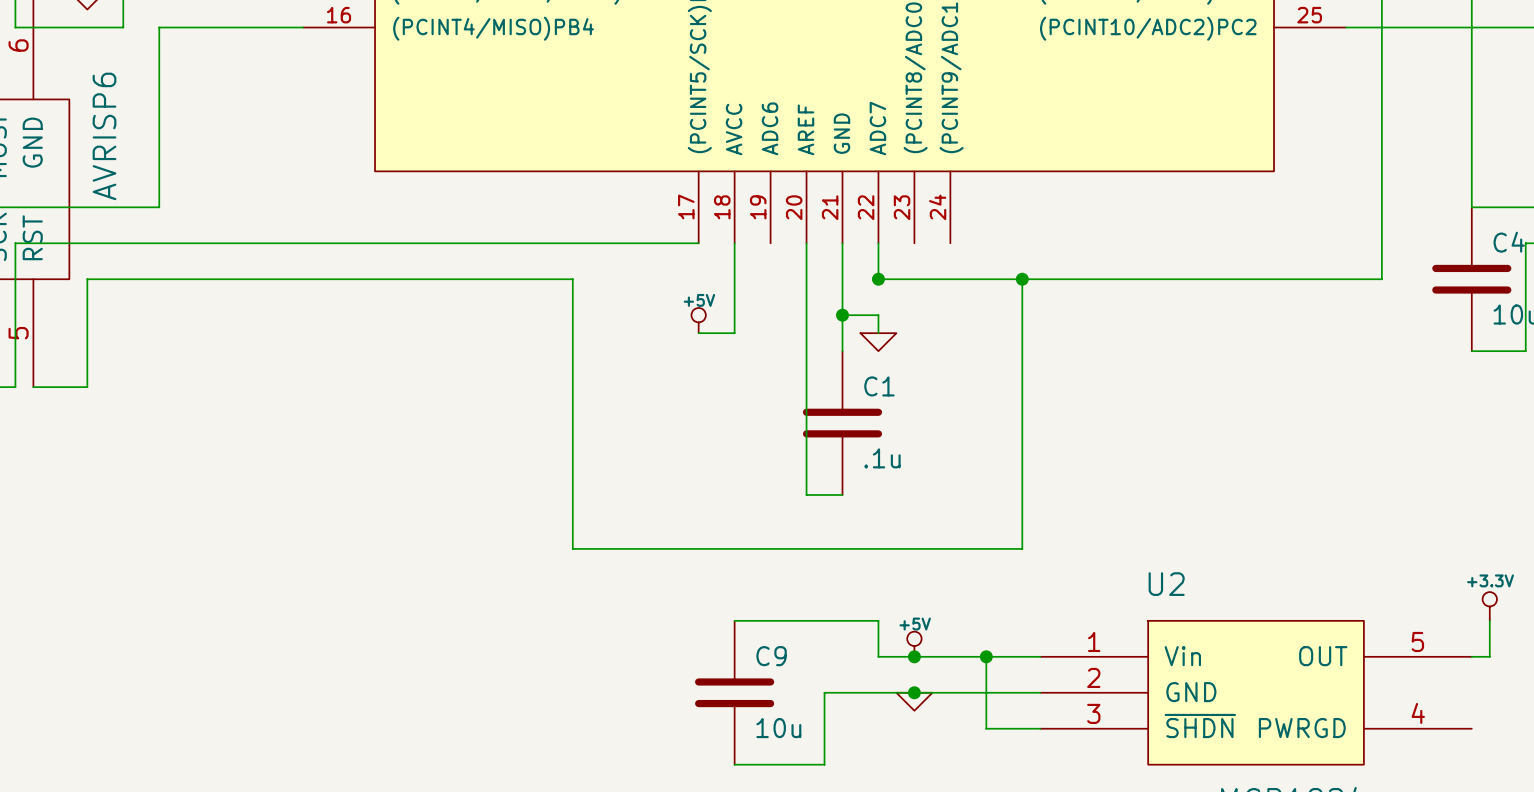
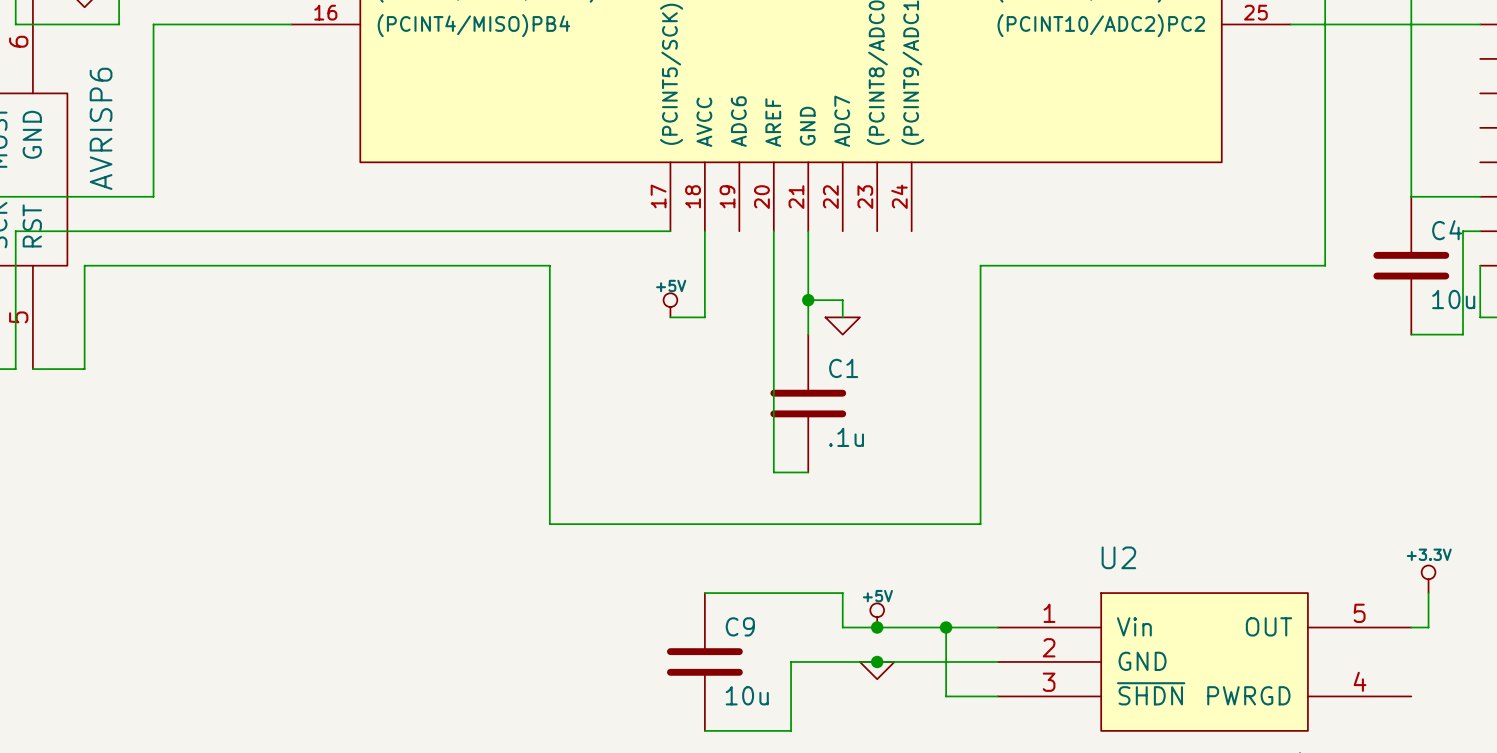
wire: (878, 243) (878, 279) (1022, 279) -> none
junction: (878, 279) -> none
junction: (1022, 279) -> none

